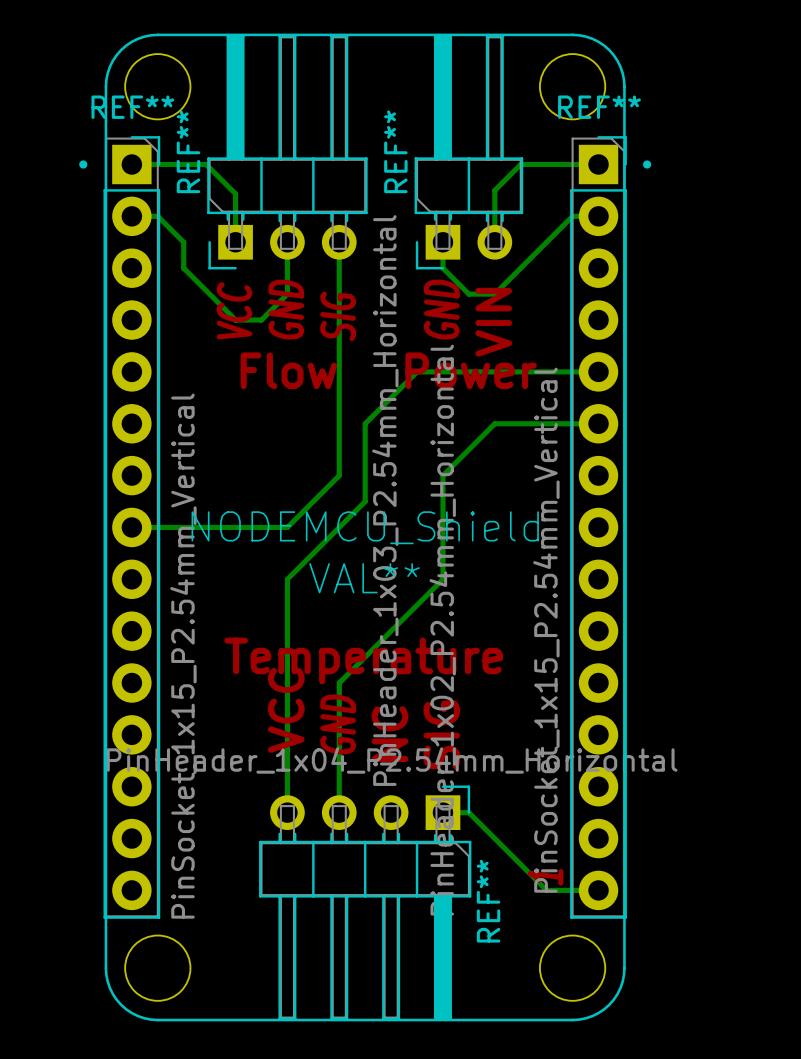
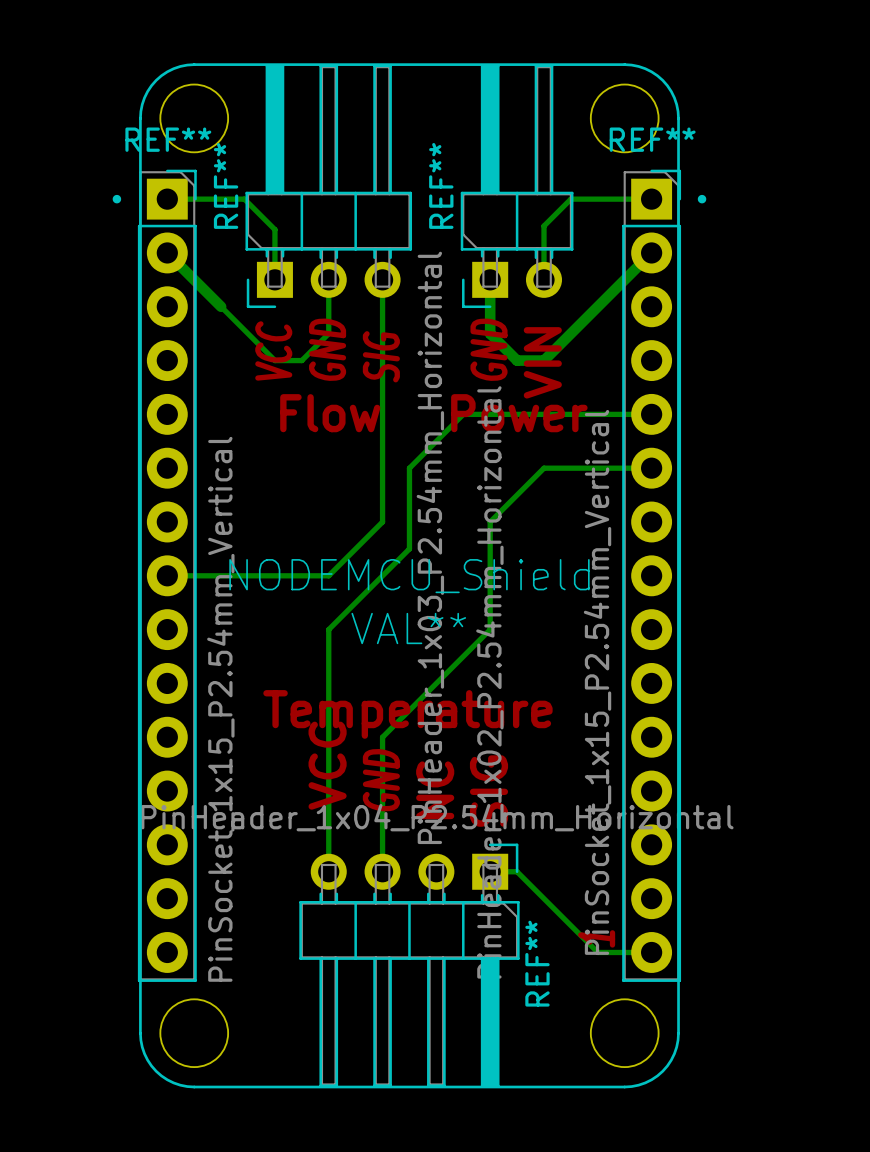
bottom track: (131, 216) (157, 216) (183, 242) (183, 268) -> (167, 252) (221, 306)
bottom track: (598, 216) (572, 216) (494, 294) (468, 294) (442, 268) -> (651, 252) (543, 360) (517, 360) (490, 333) (490, 279)

